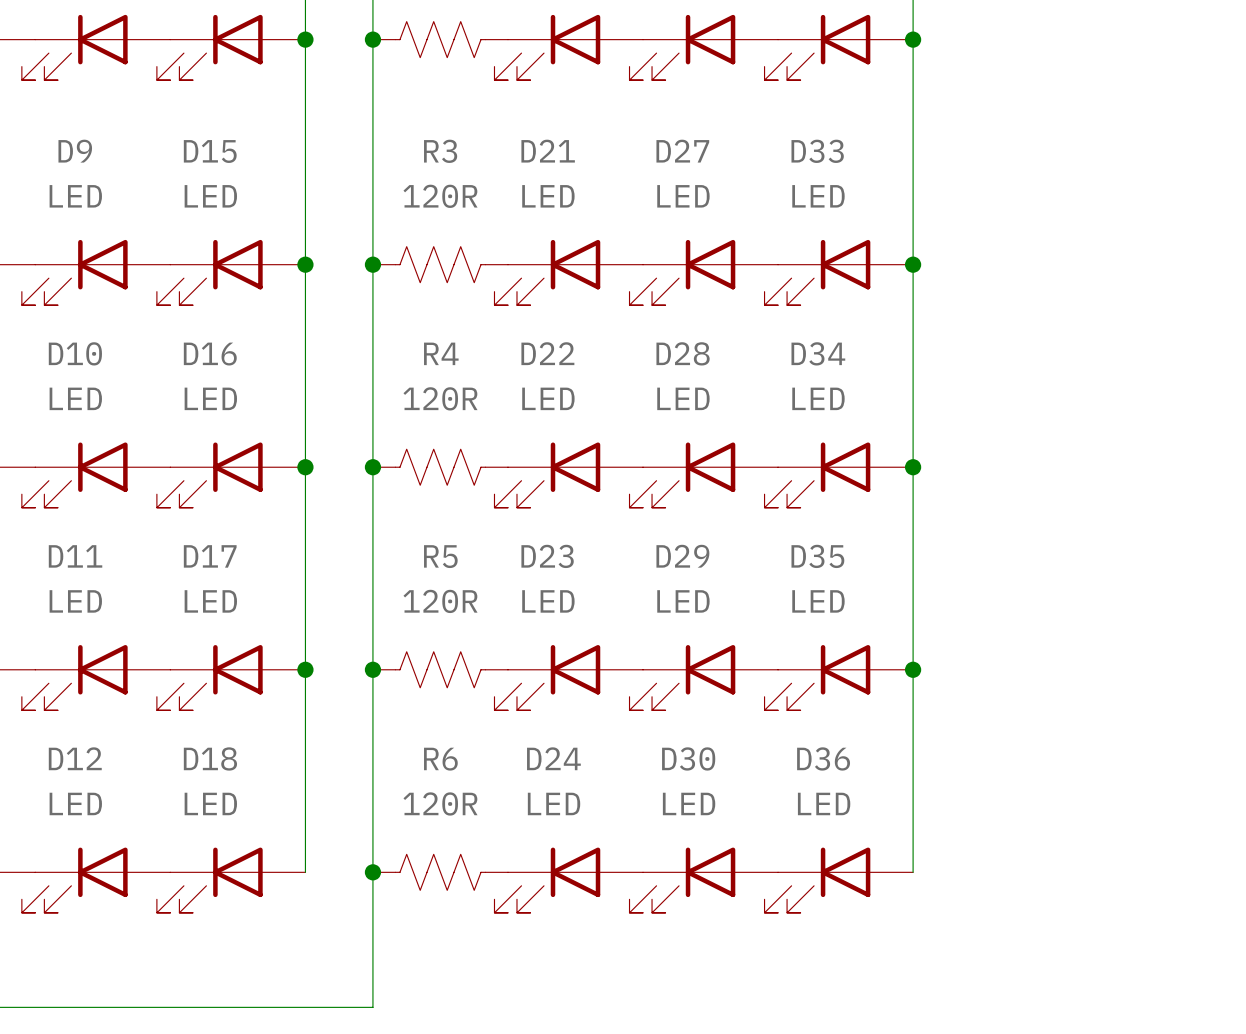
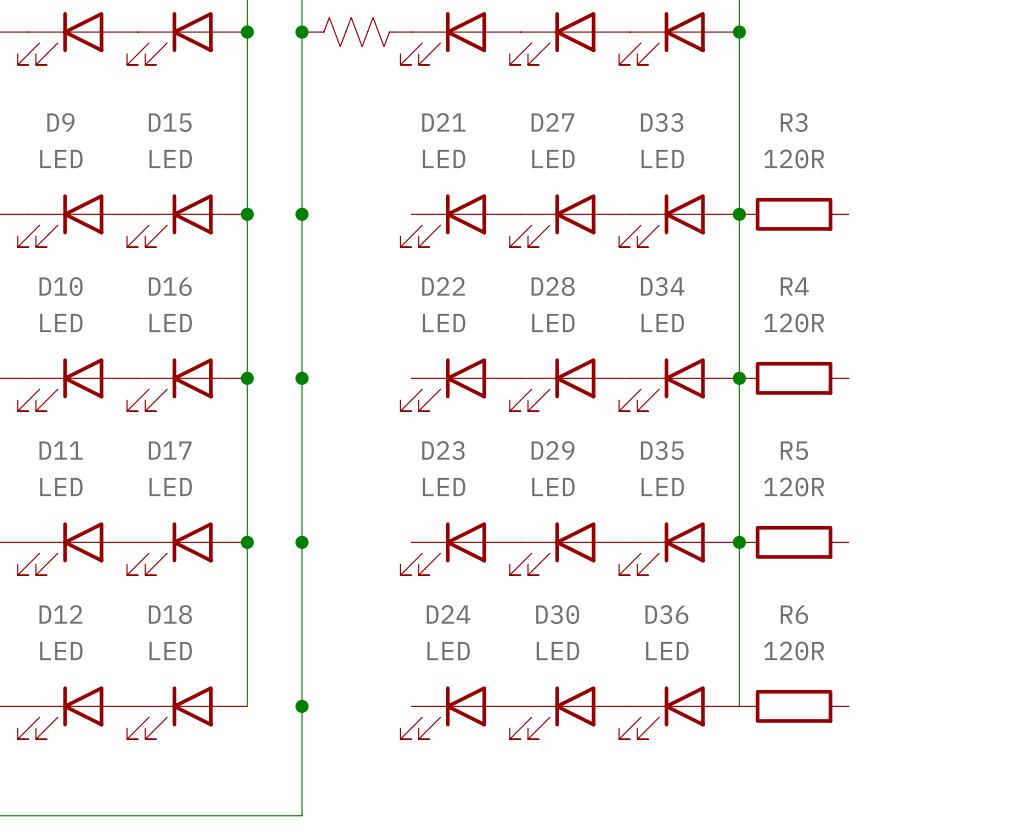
R3 symbol: [372, 246, 508, 283] -> [739, 197, 849, 231]
R4 symbol: [372, 449, 508, 486] -> [739, 361, 849, 395]
R5 symbol: [372, 651, 508, 688] -> [739, 525, 849, 559]
R6 symbol: [372, 854, 508, 891] -> [739, 689, 849, 723]

